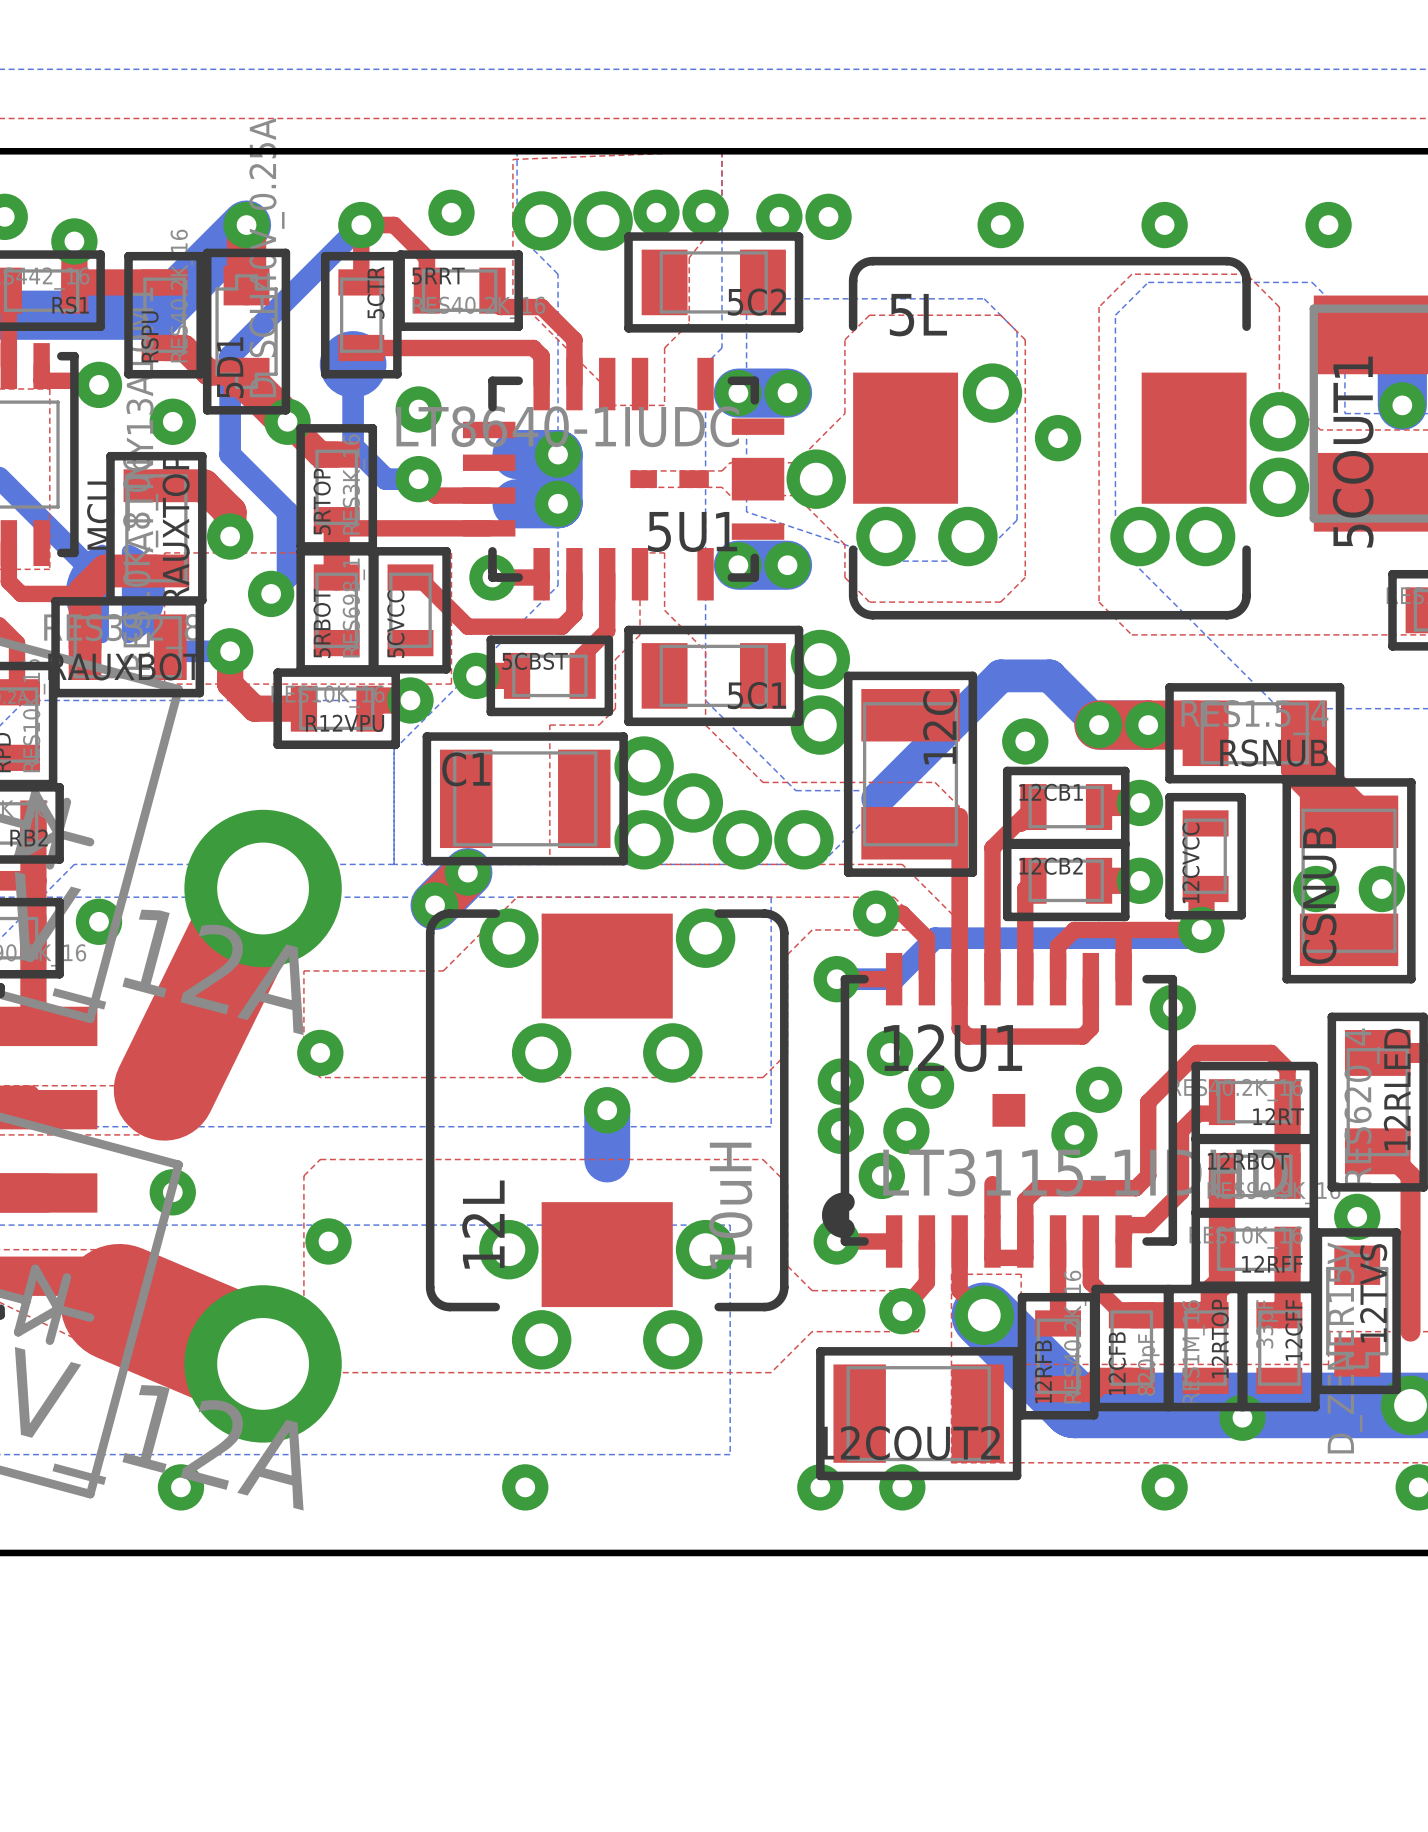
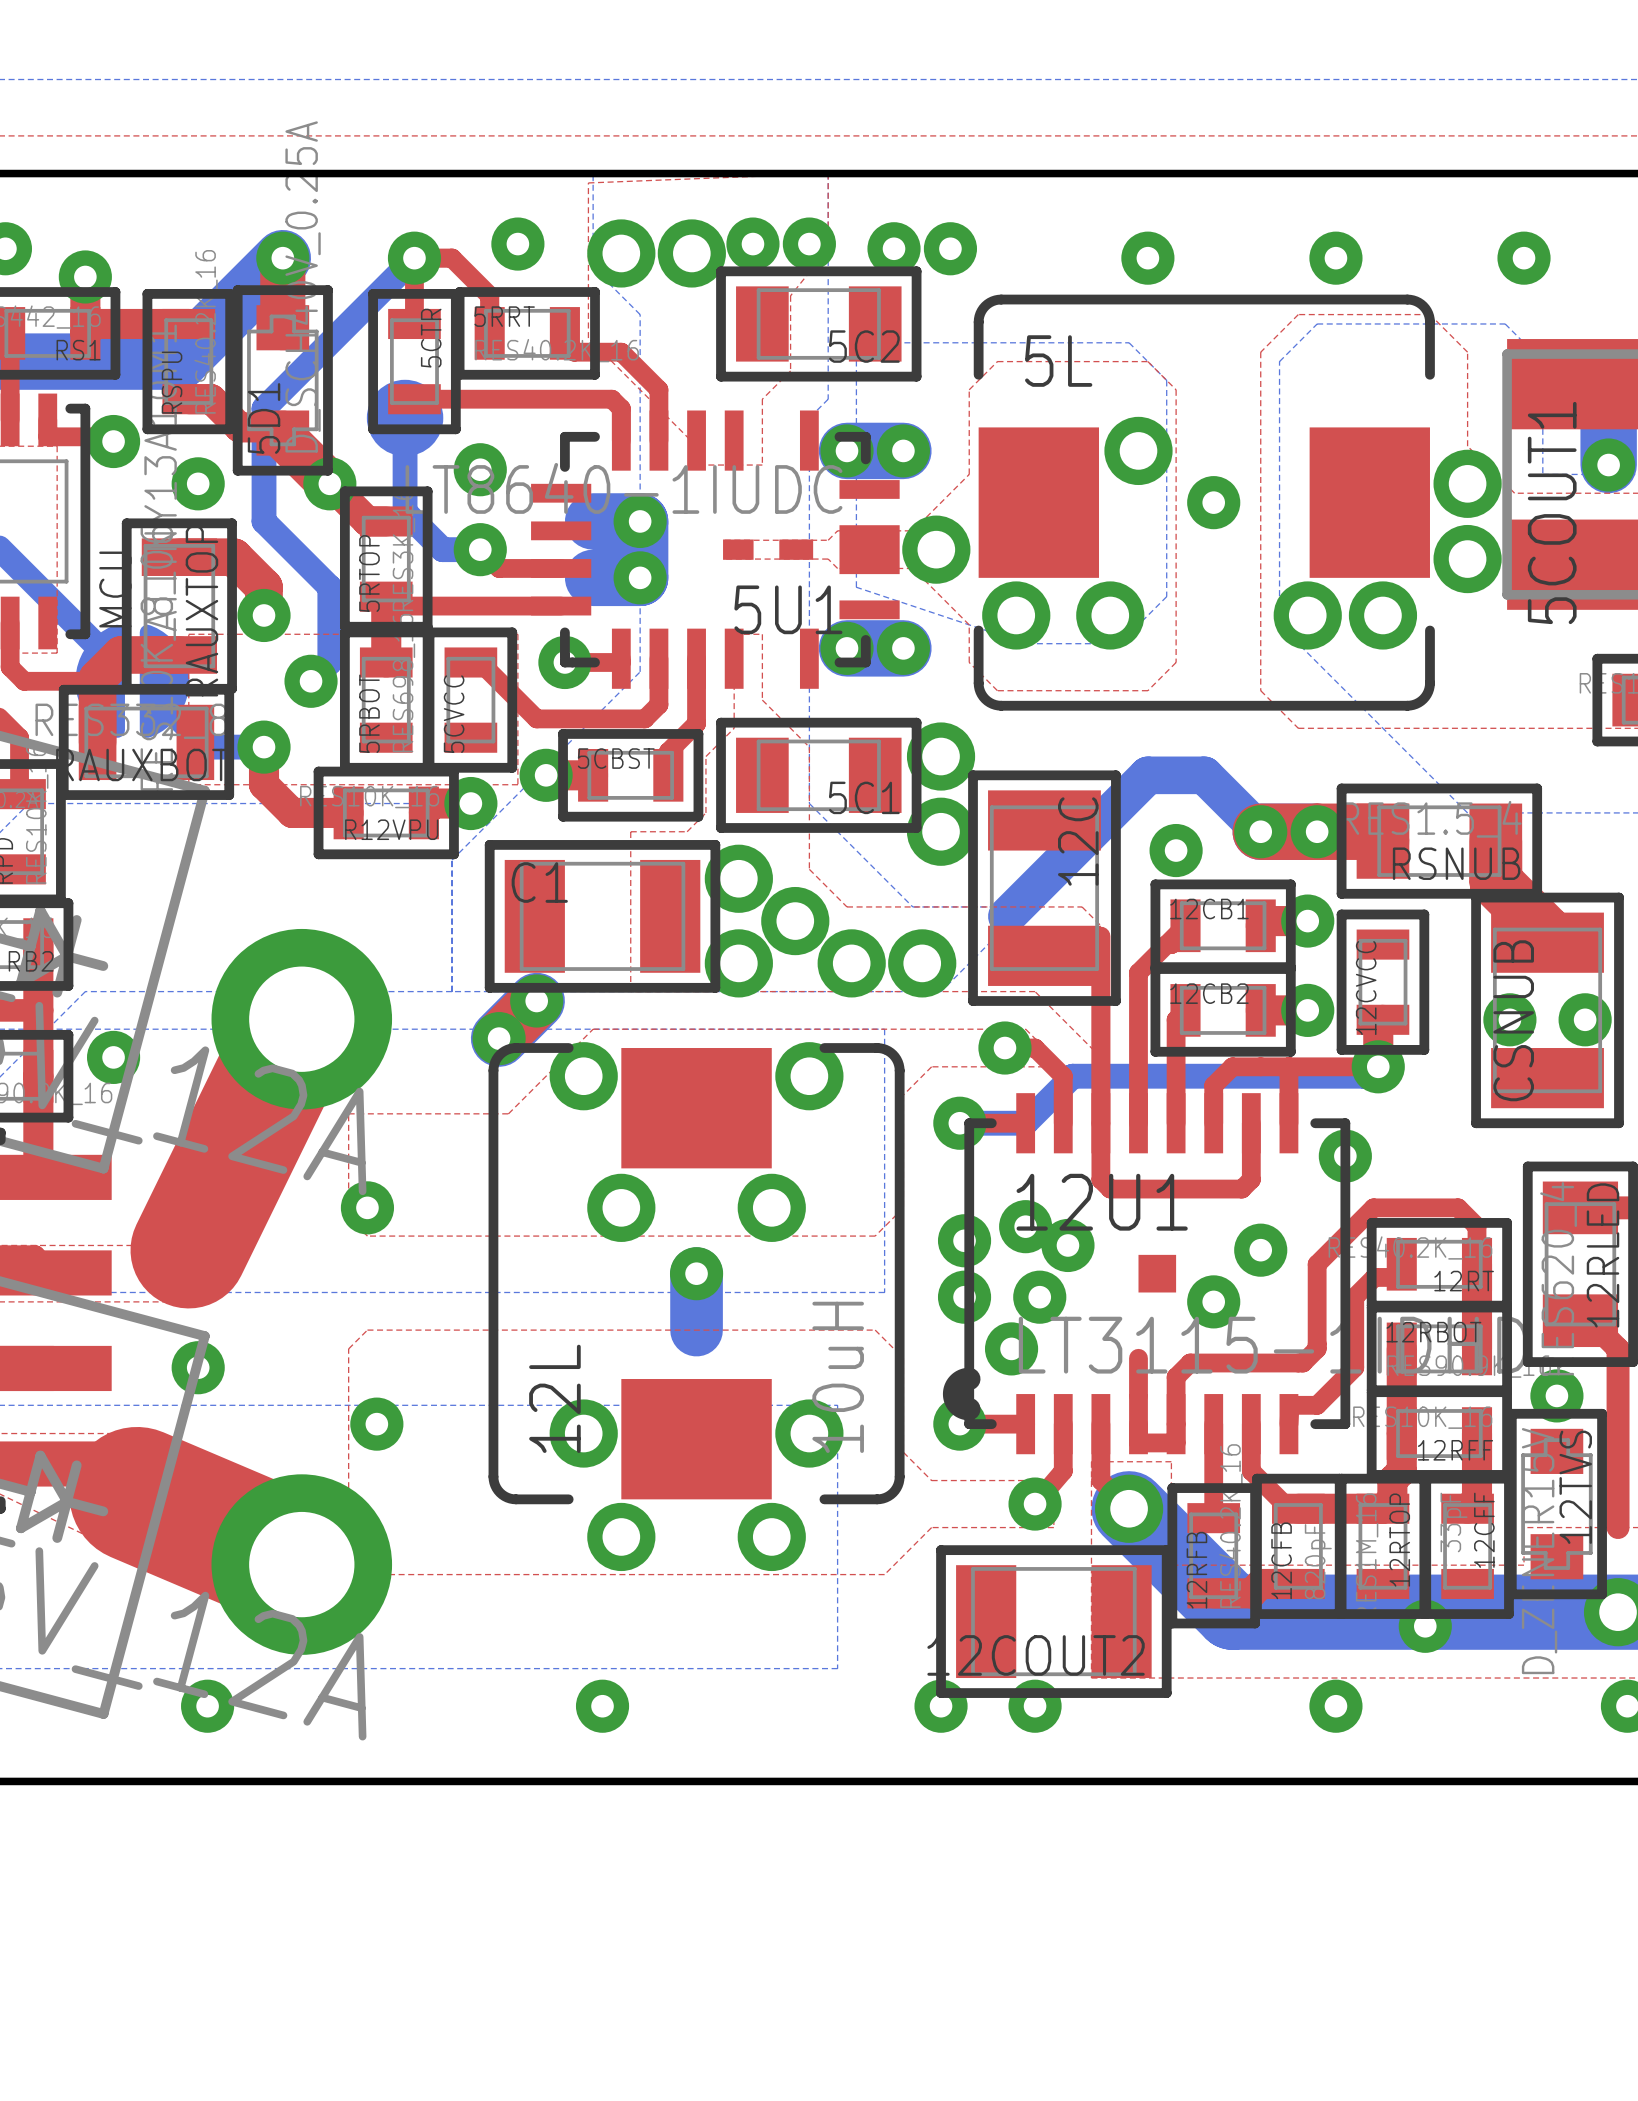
top zone outline: (705, 725) (762, 782) (935, 782) (943, 790) -> (809, 831) (809, 869) (847, 906) (1082, 906)
via position: (890, 1052) -> (1025, 1226)
via position: (1074, 1134) -> (1213, 1301)

